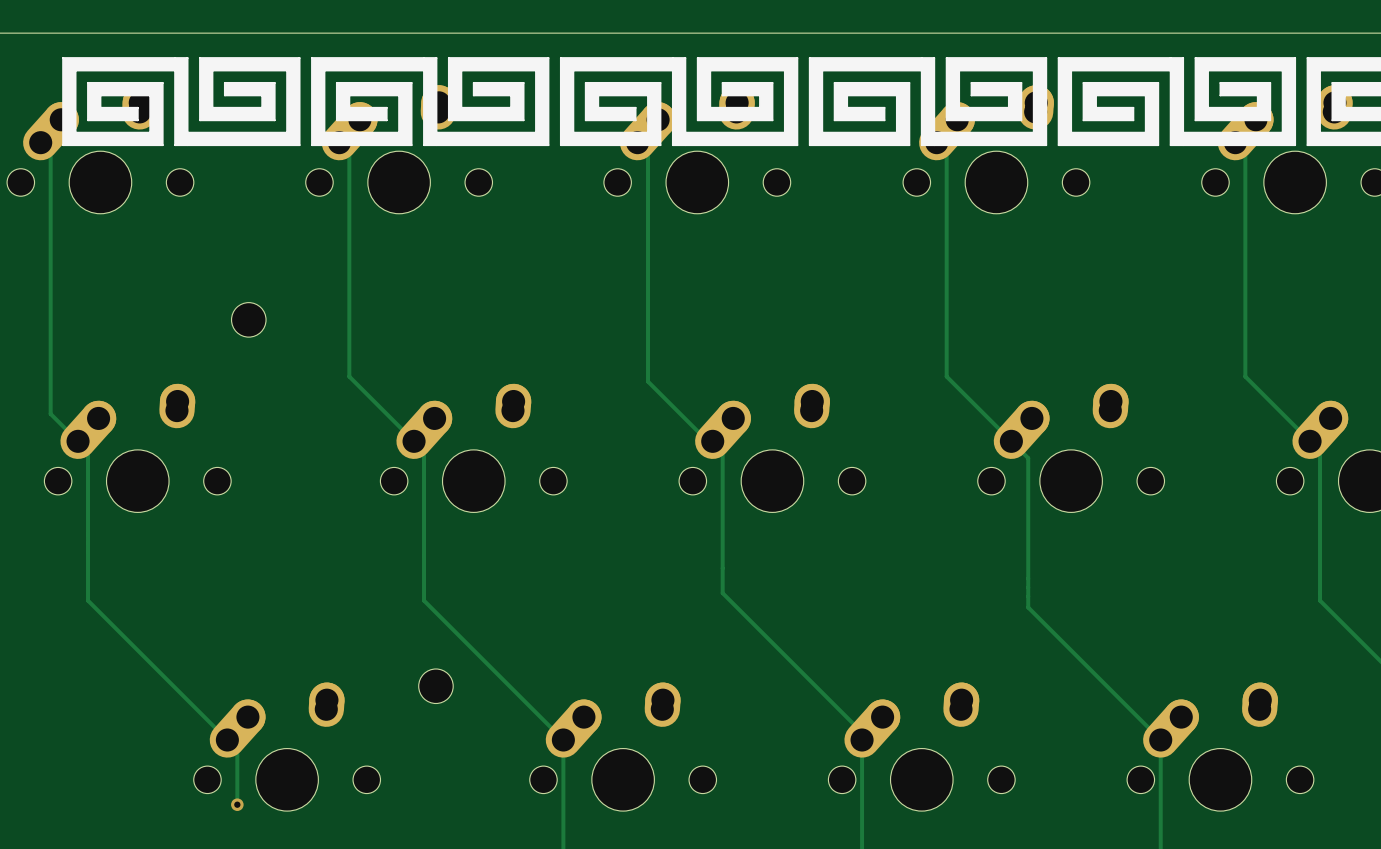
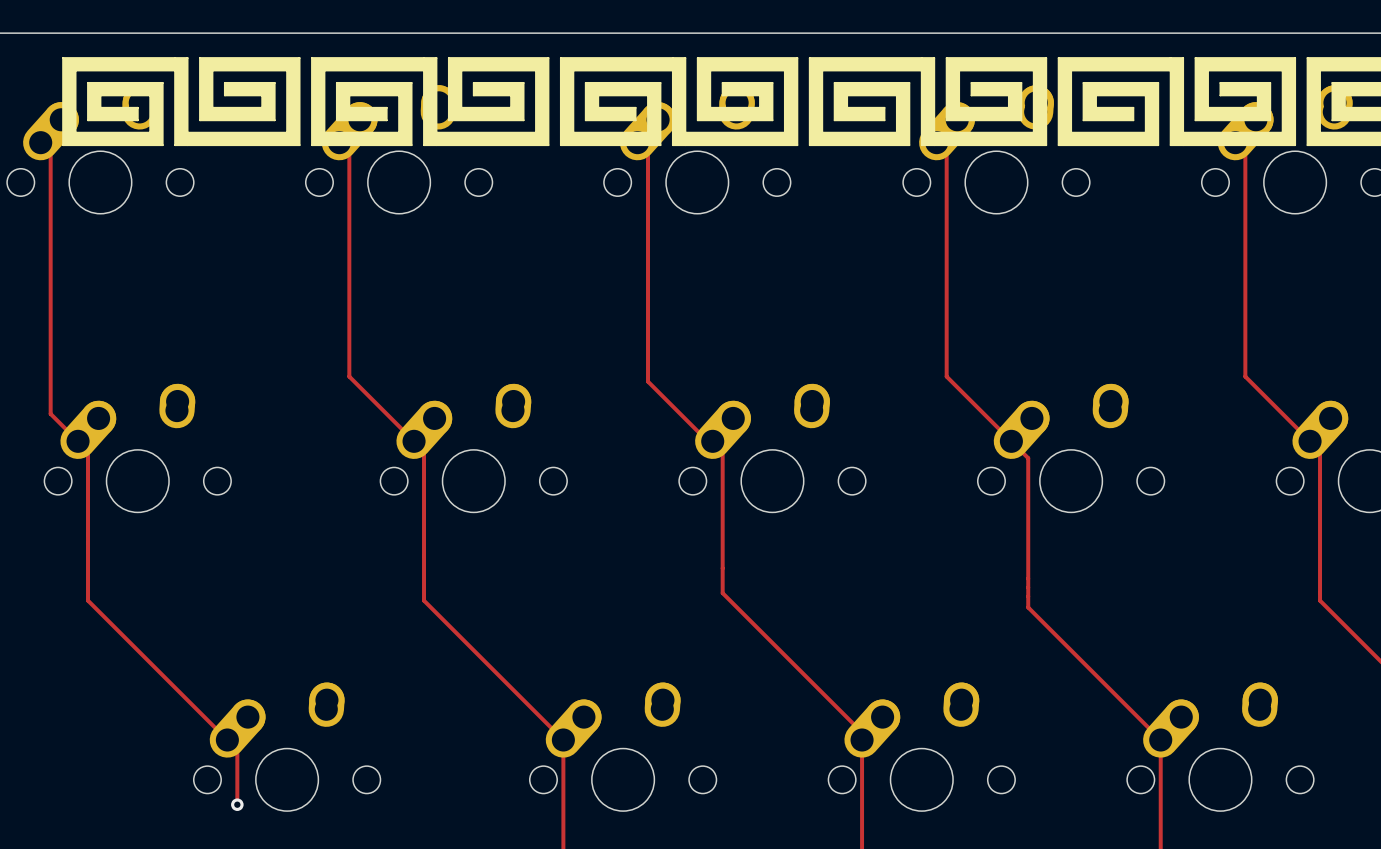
part: (248, 319) -> none
part: (435, 686) -> none

